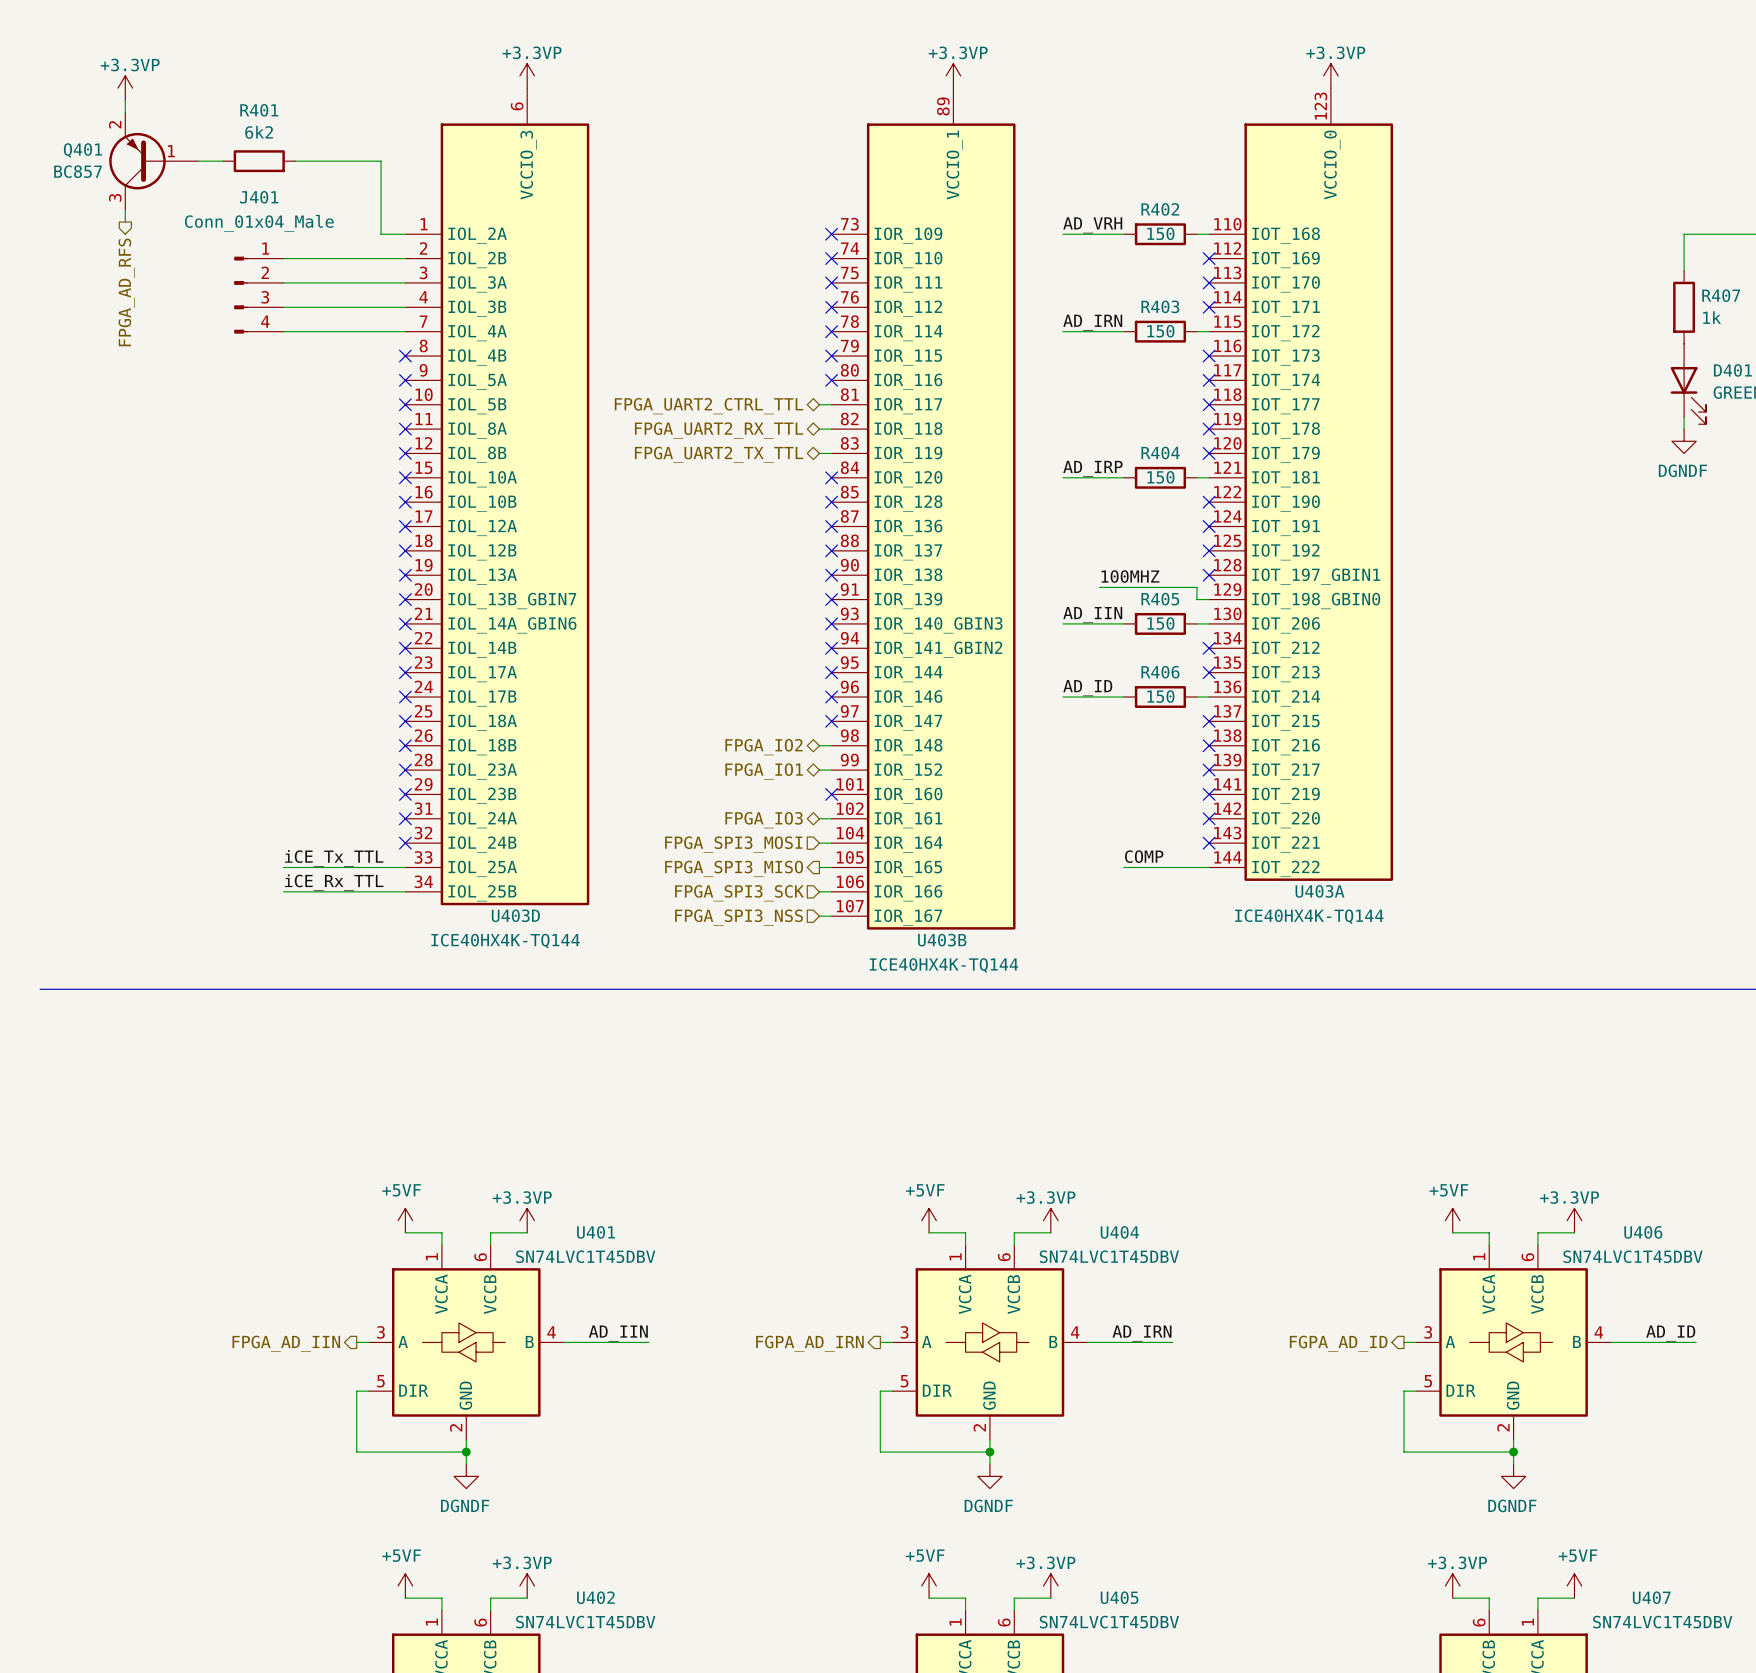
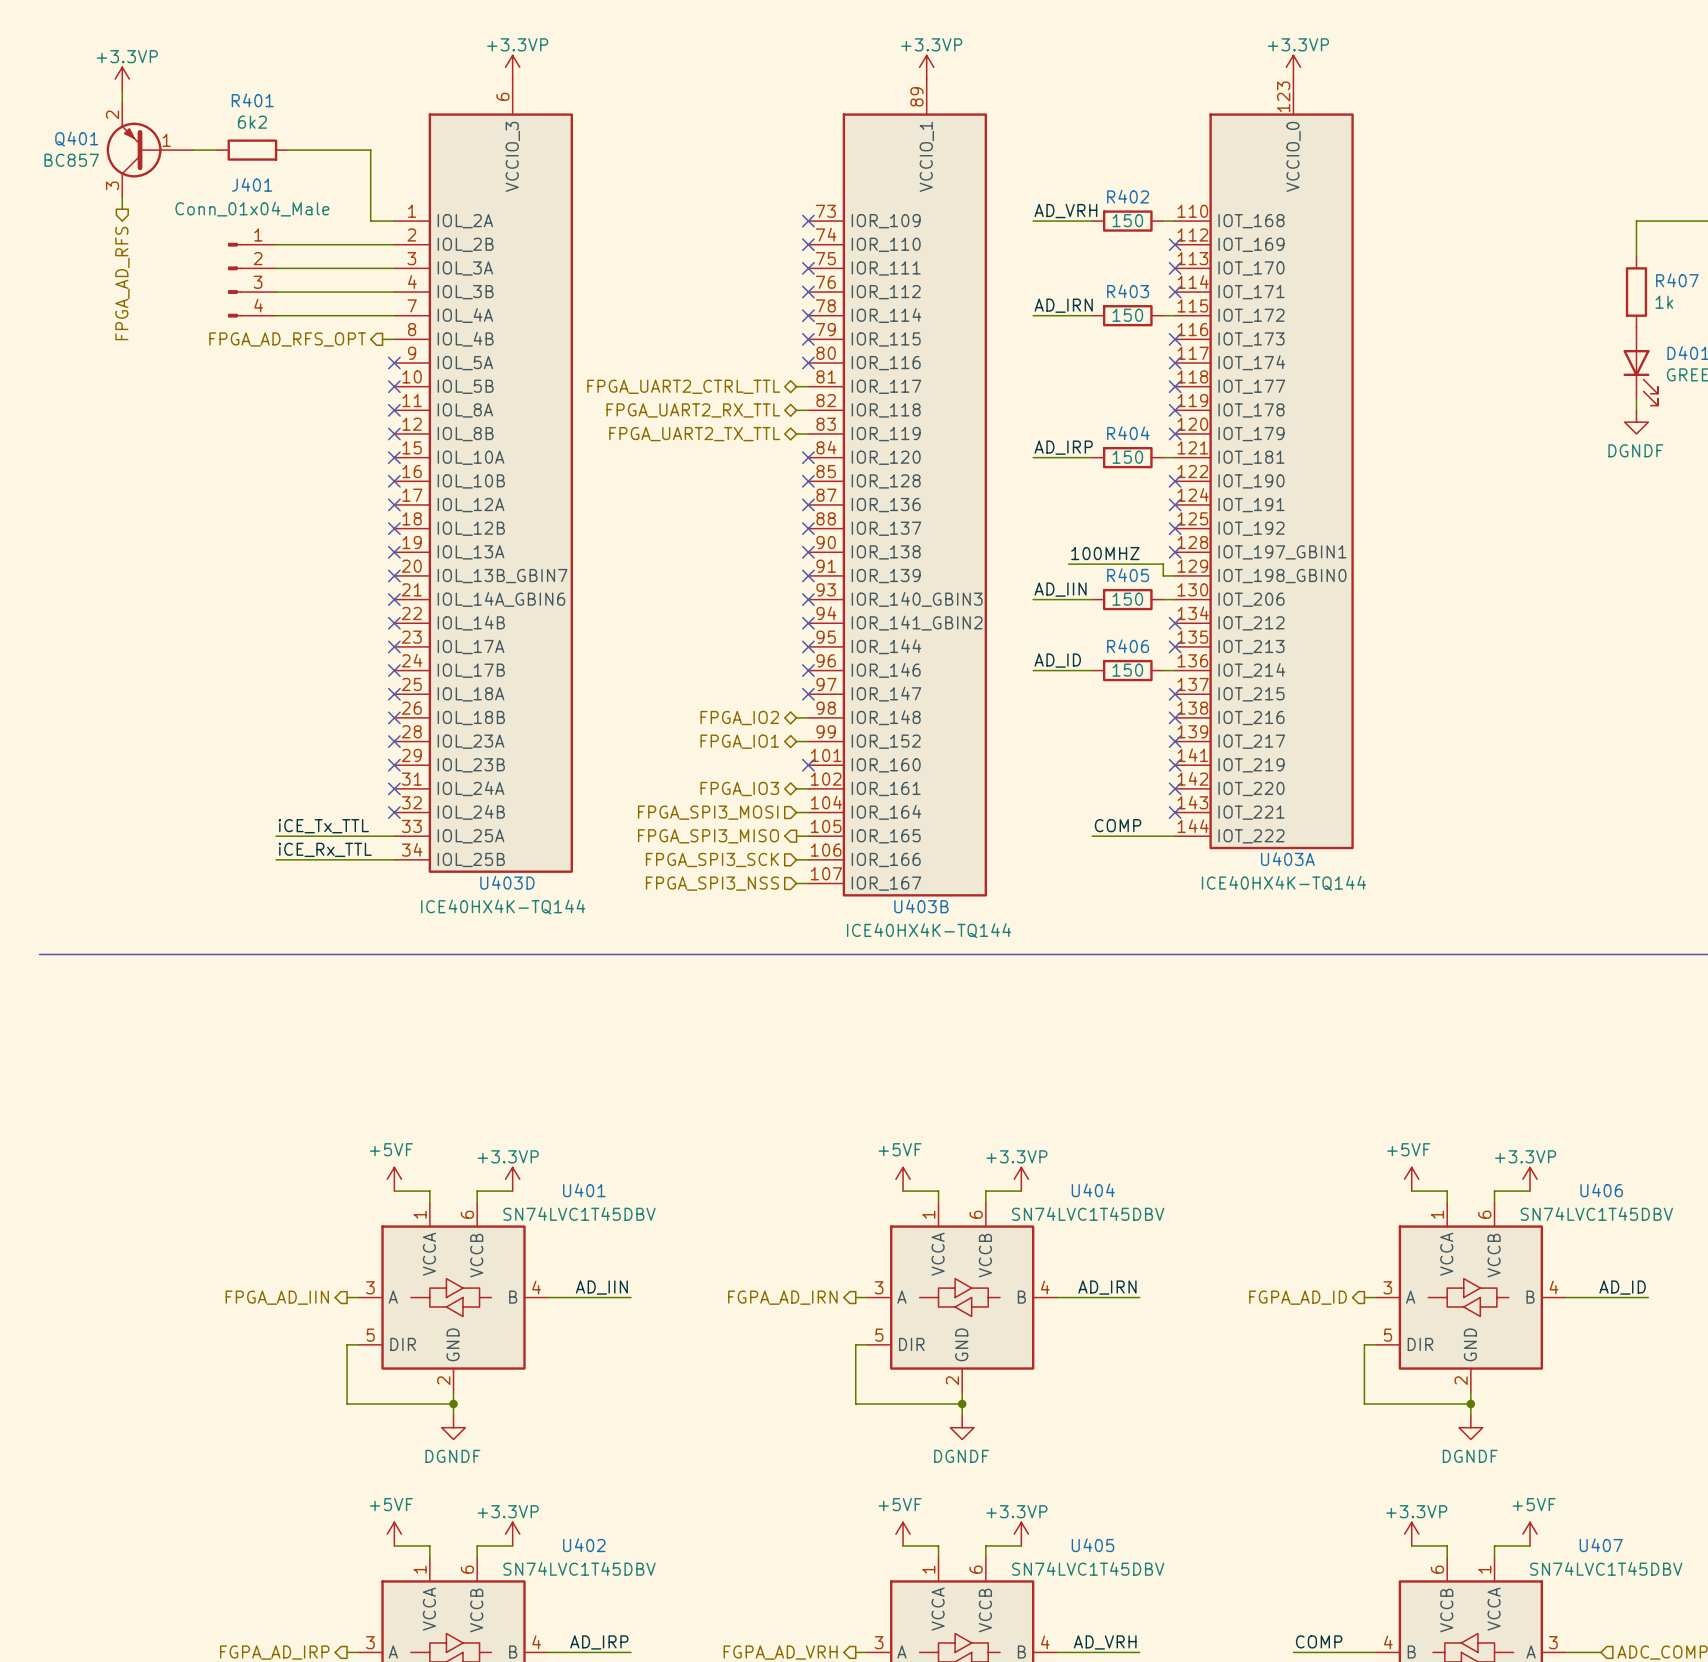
wire: none -> (382, 339) (394, 339)
no-connect mark: (405, 356) -> none
hierarchical label: none -> FPGA_AD_RFS_OPT (287, 339)

